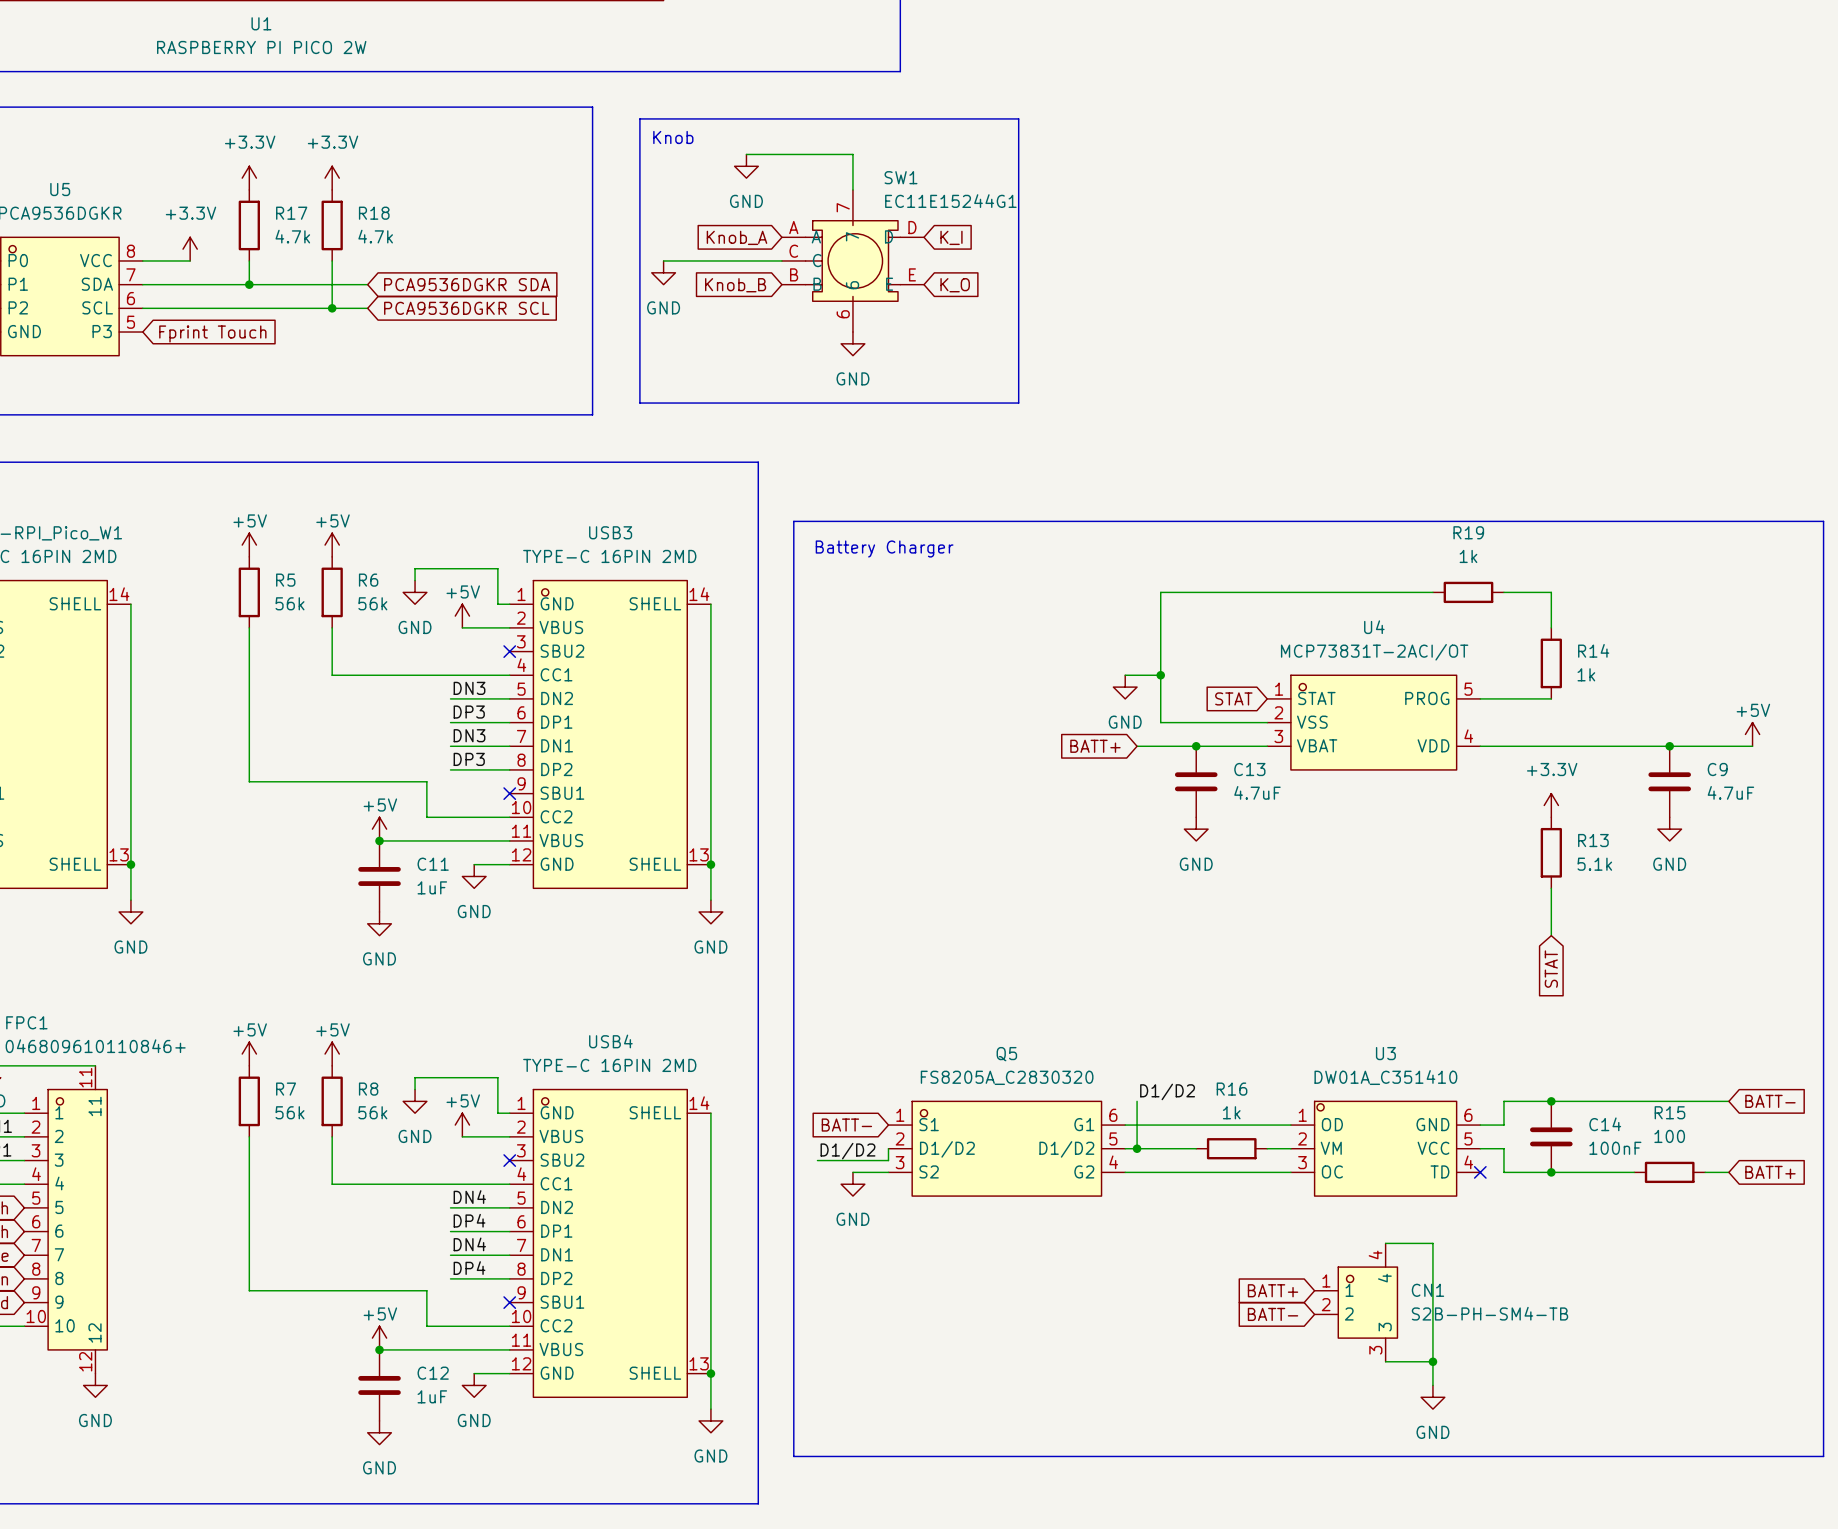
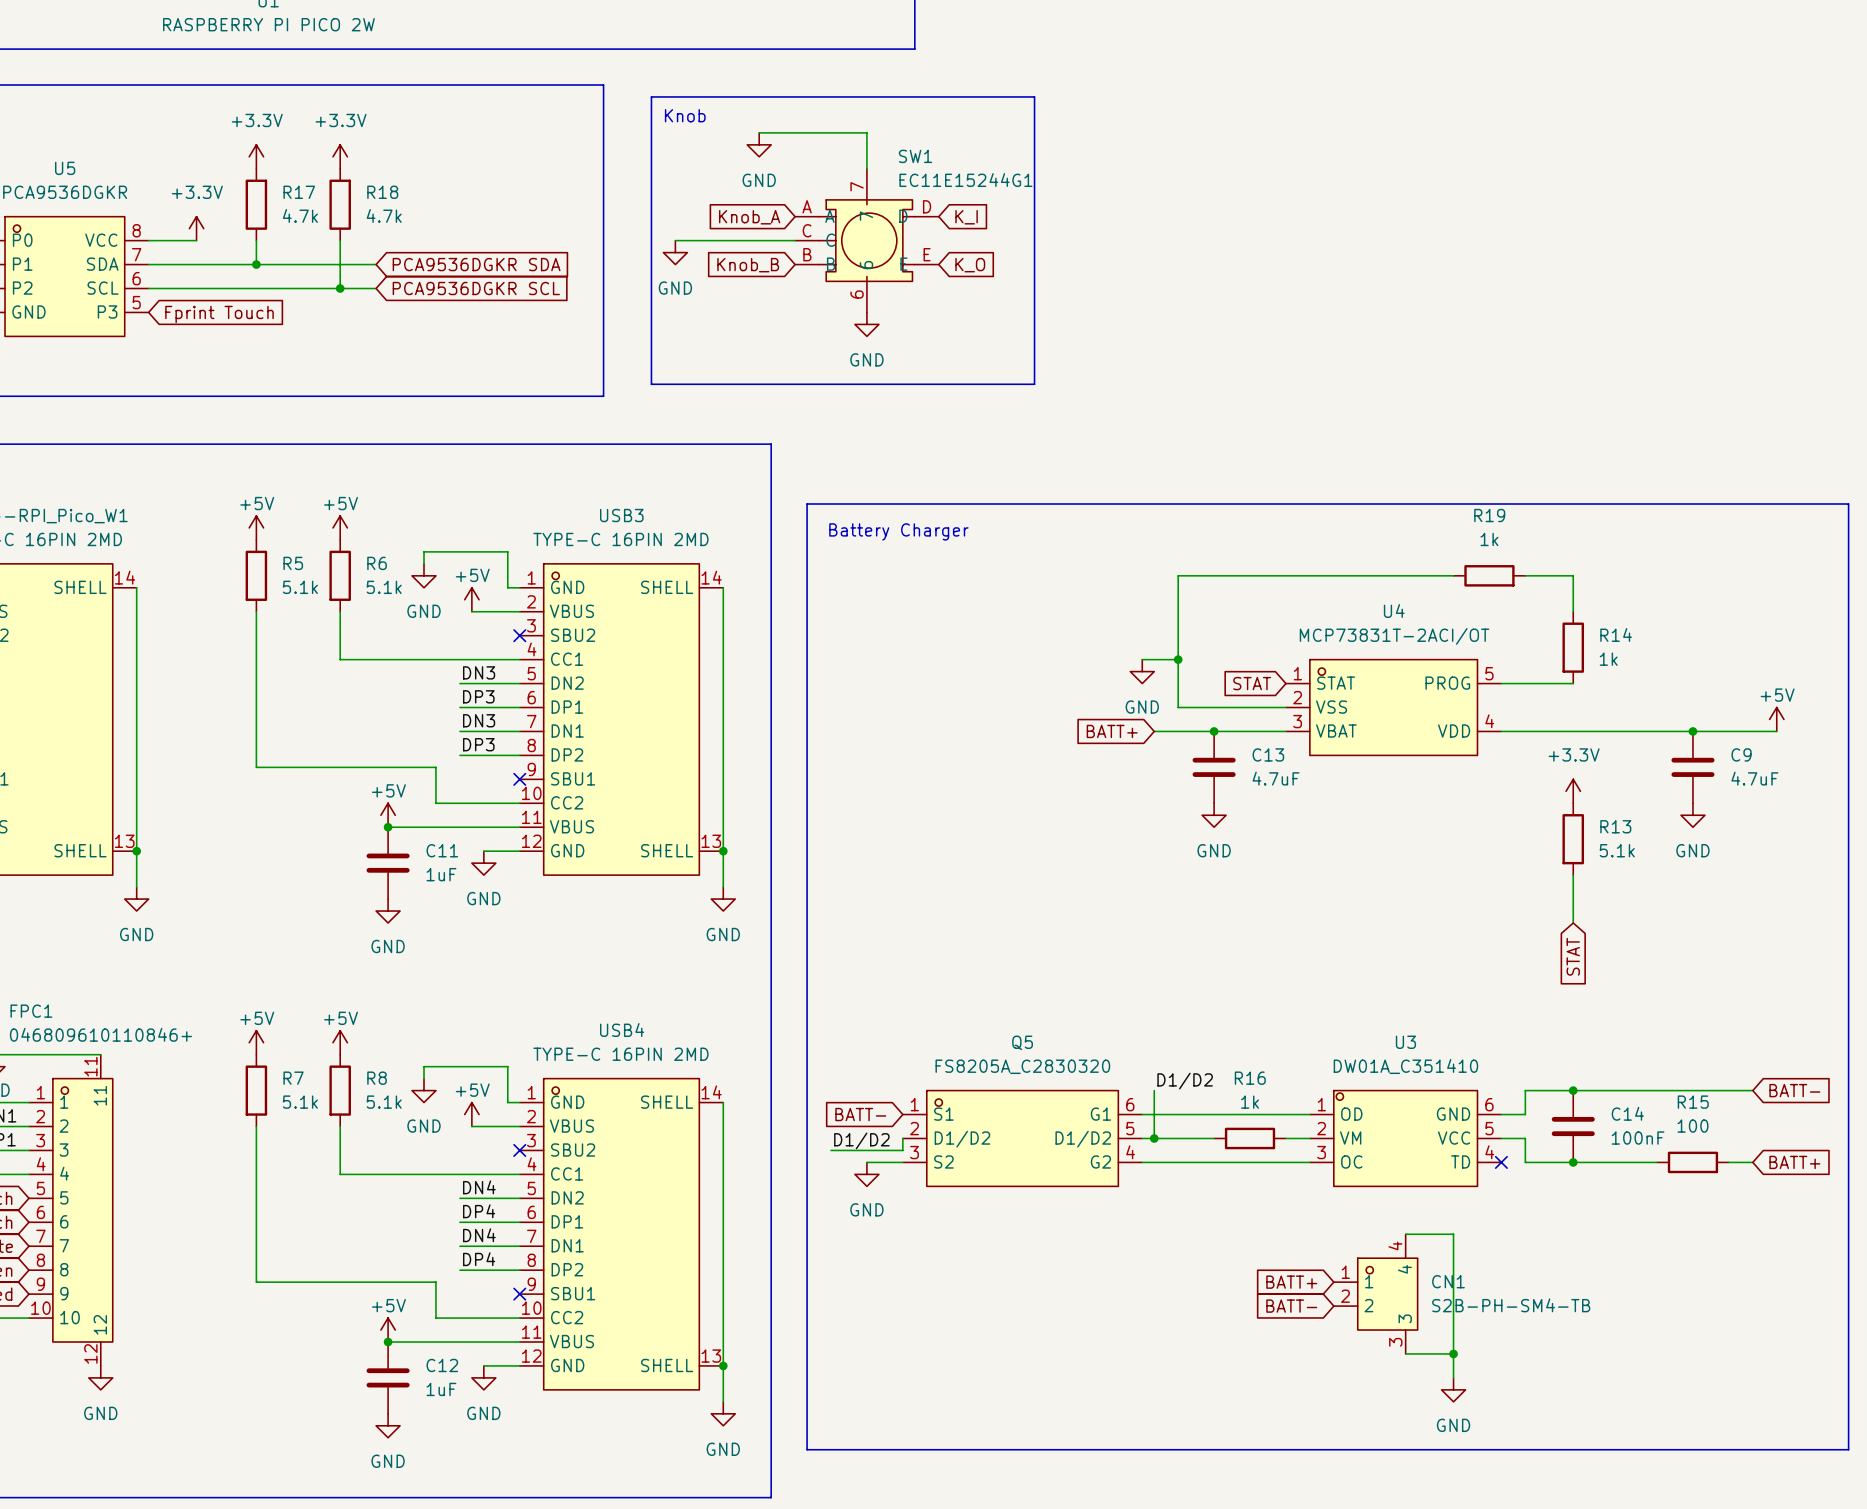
R5 value: 56k (289, 603) -> 5.1k (300, 587)
R6 value: 56k (372, 603) -> 5.1k (384, 587)
R7 value: 56k (289, 1112) -> 5.1k (300, 1102)
R8 value: 56k (372, 1112) -> 5.1k (384, 1102)

